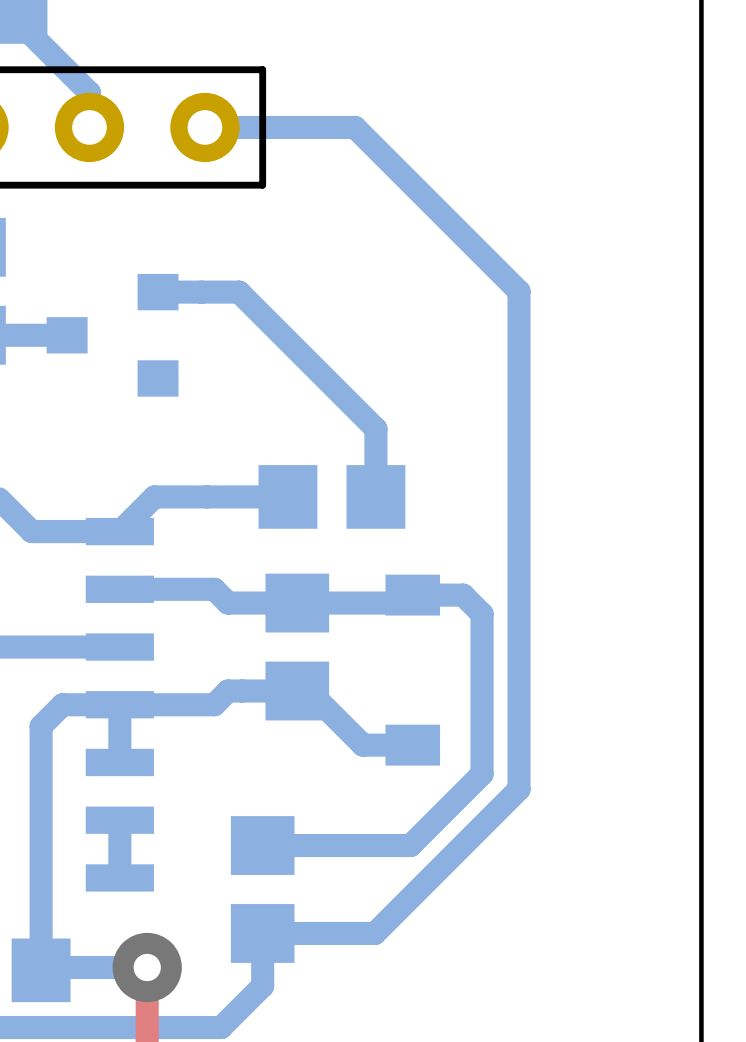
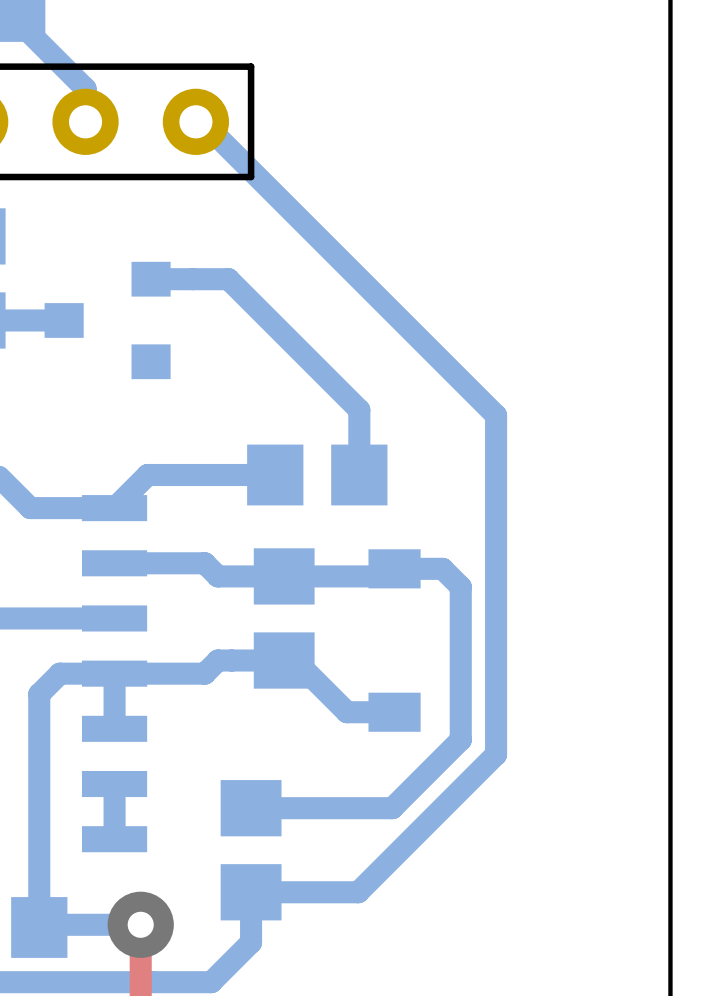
bottom track: (211, 127) (355, 127) (519, 291) (519, 434) -> (202, 121) (496, 415)

